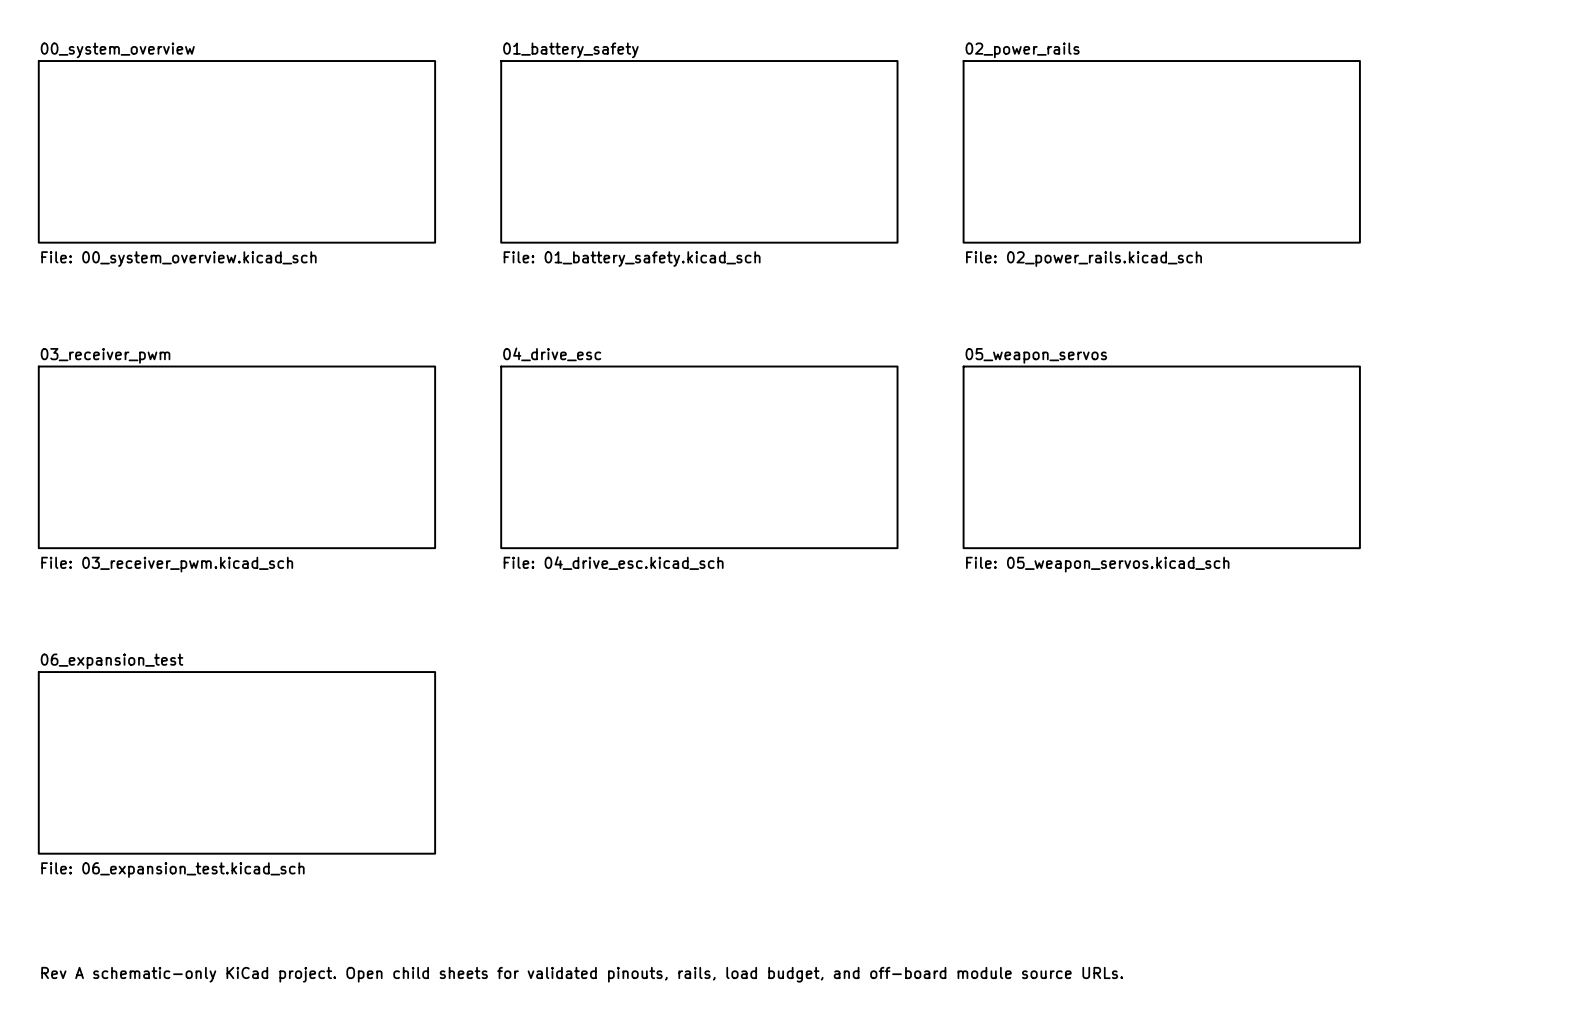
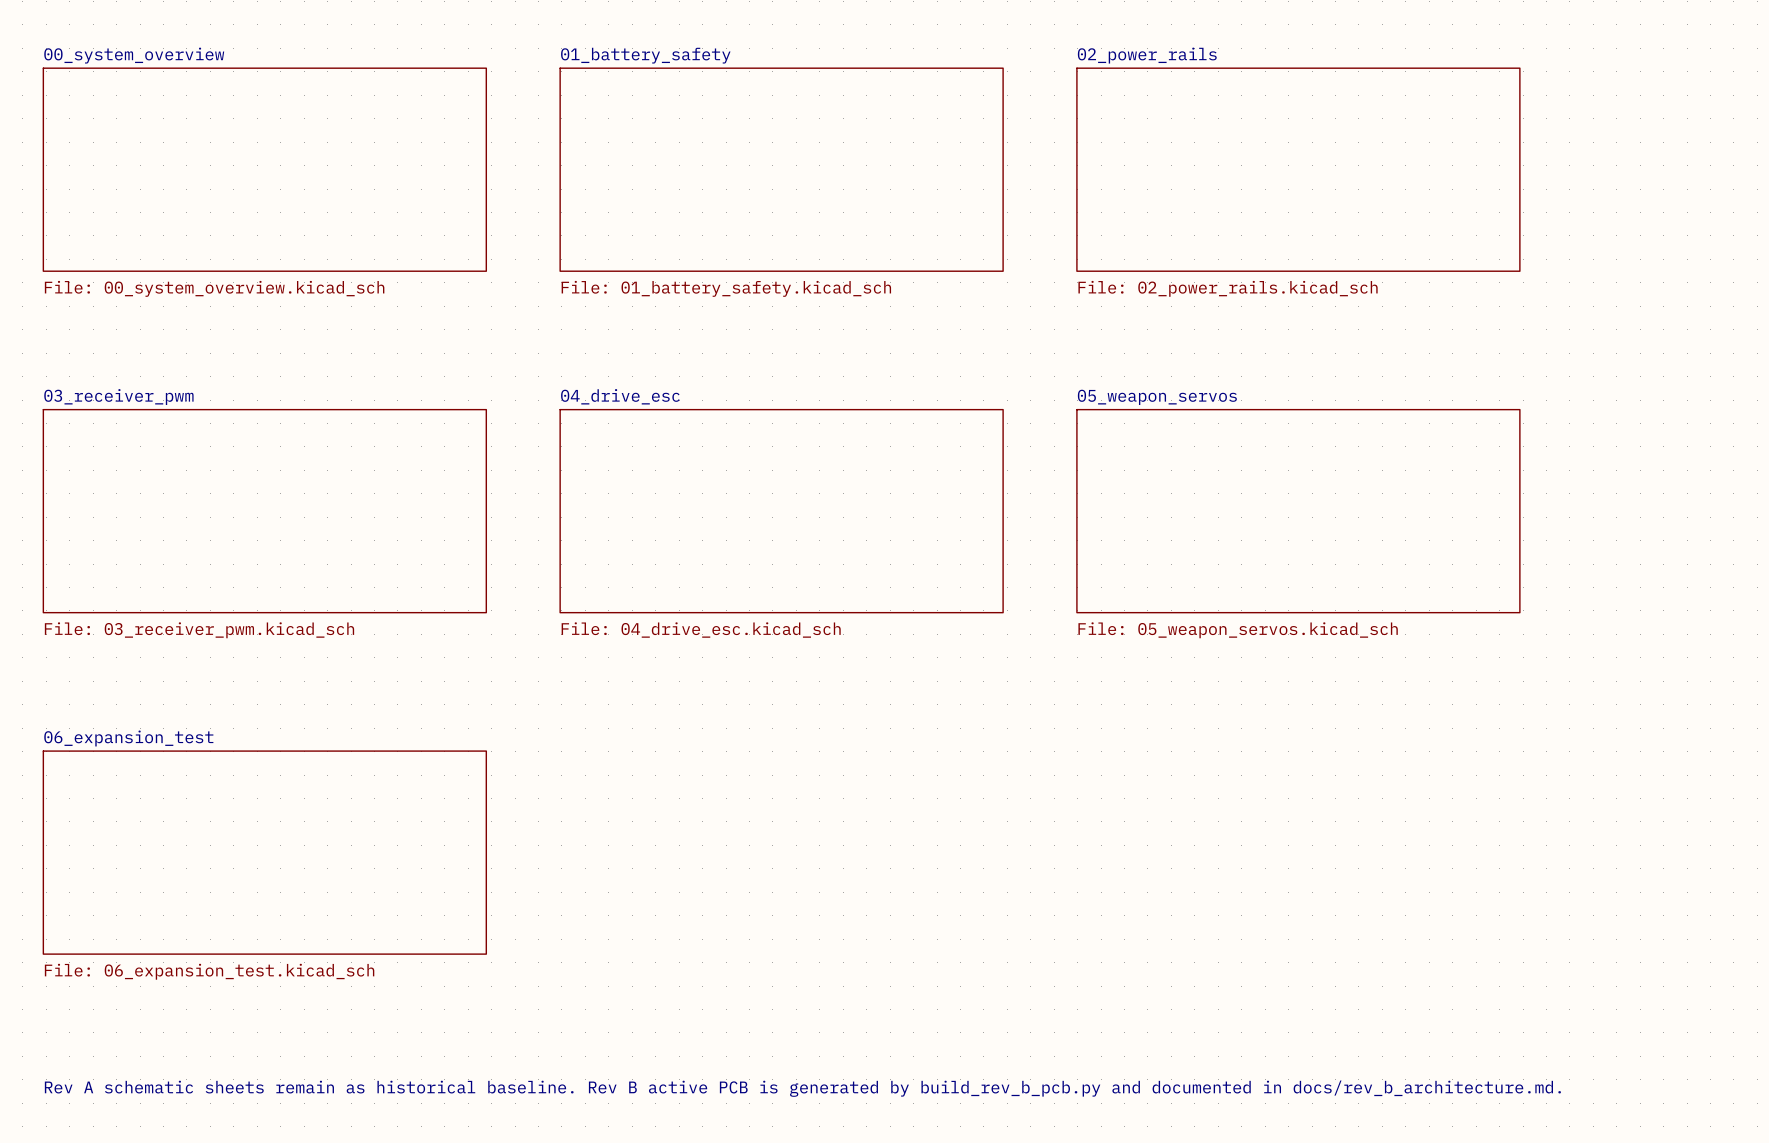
text: Rev A schematic-only KiCad project. Open child sheets for validated pinouts, rails, load budget, and off-board module source URLs. (582, 974) -> Rev A schematic sheets remain as historical baseline. Rev B active PCB is generated by build_rev_b_pcb.py and documented in docs/rev_b_architecture.md. (802, 1088)

